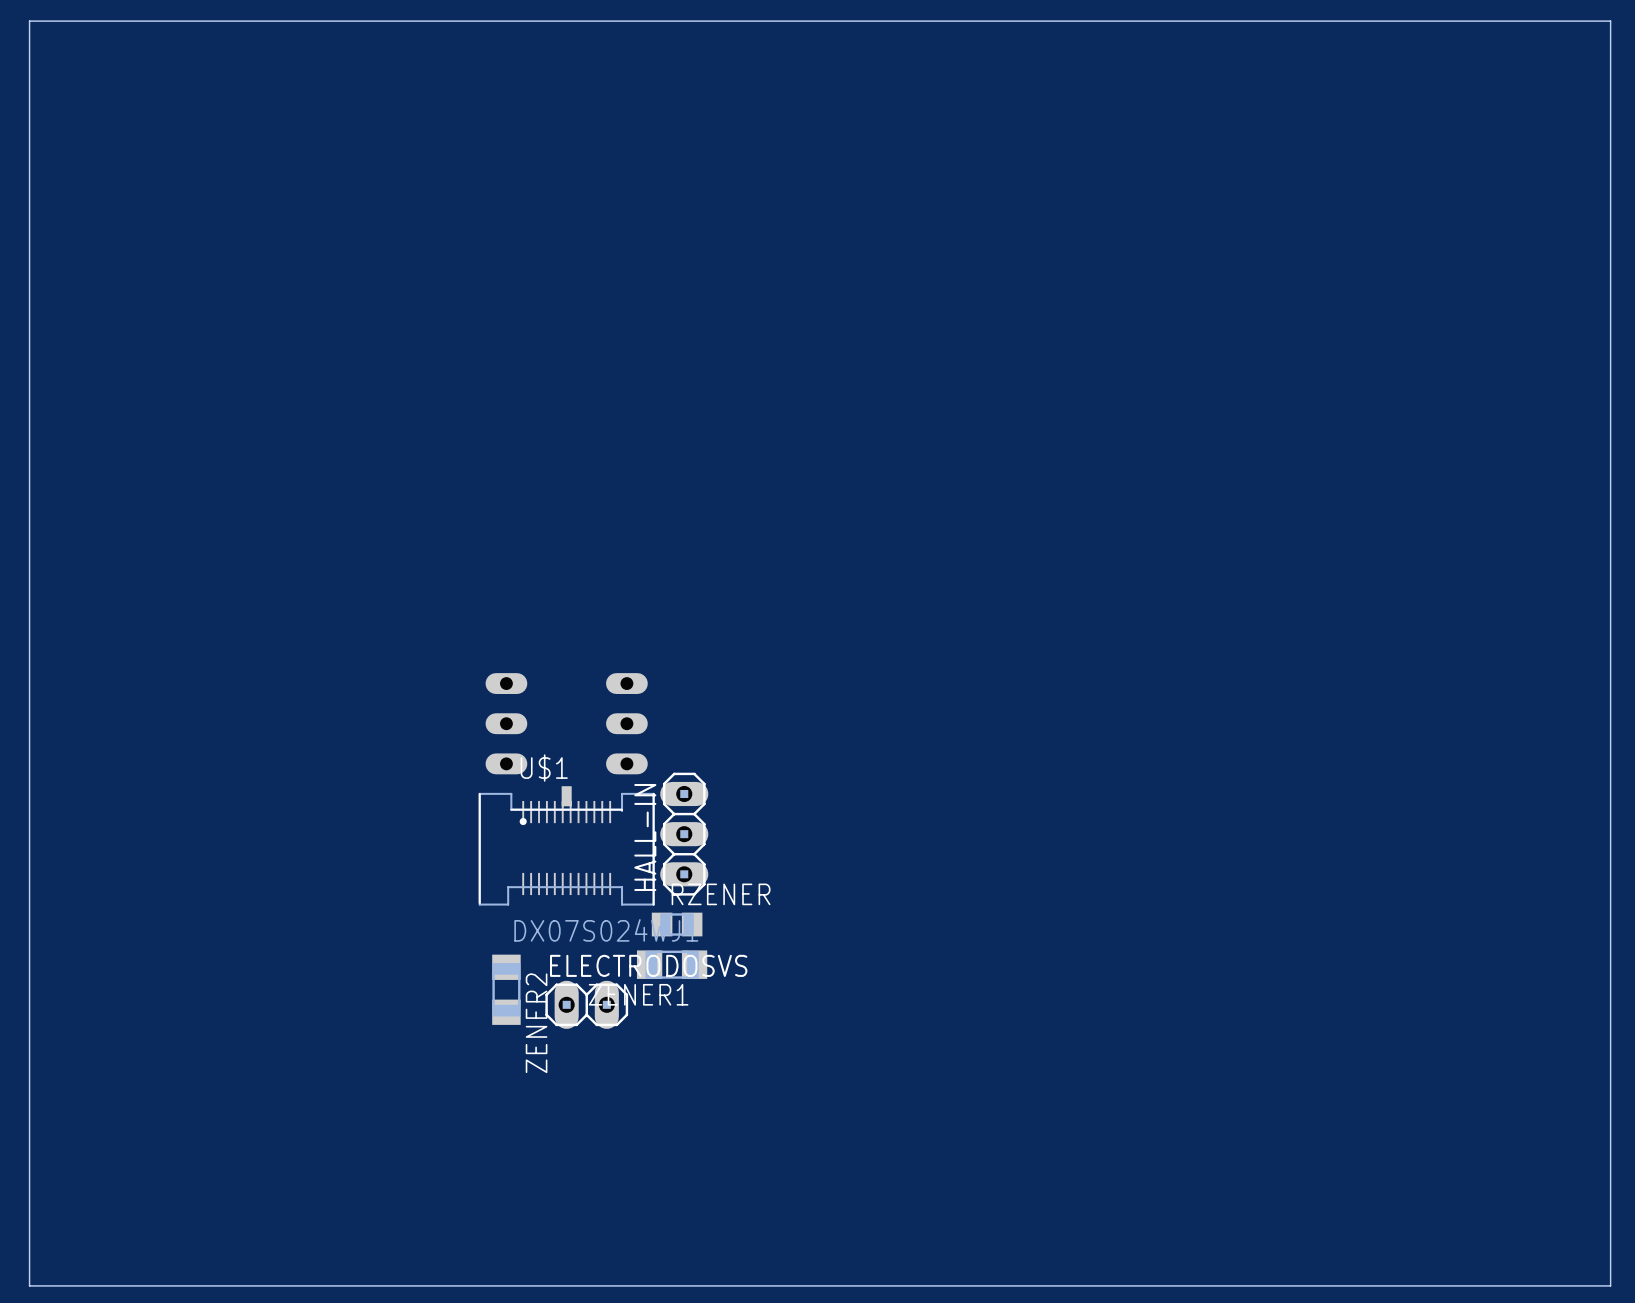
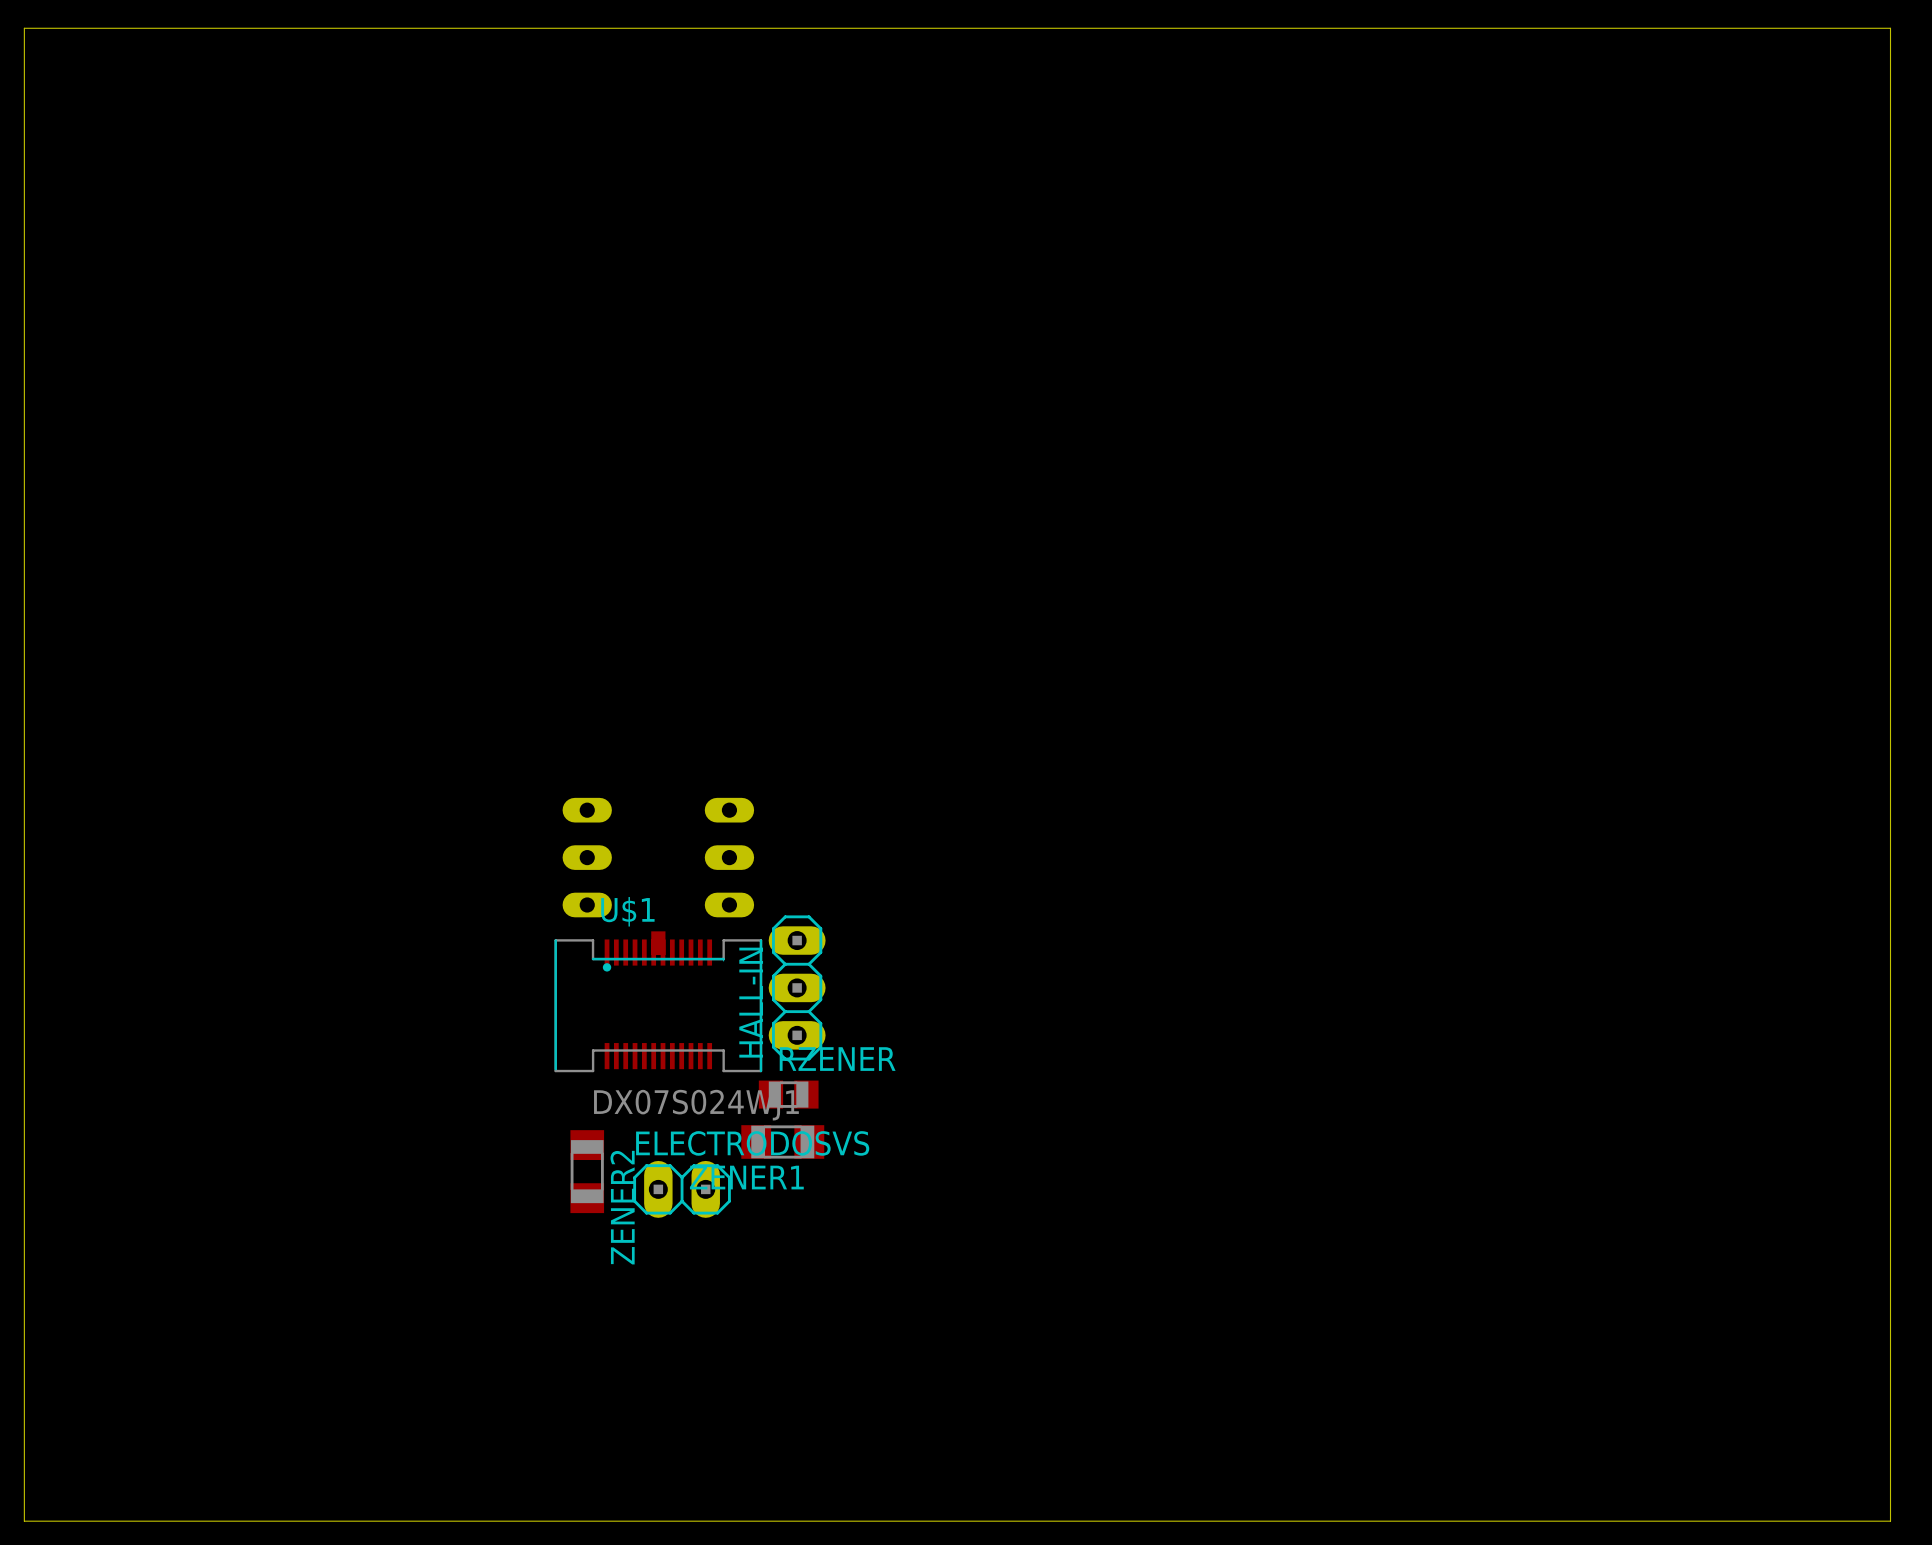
U$1 footprint: [478, 786, 655, 906] -> [554, 931, 763, 1073]

